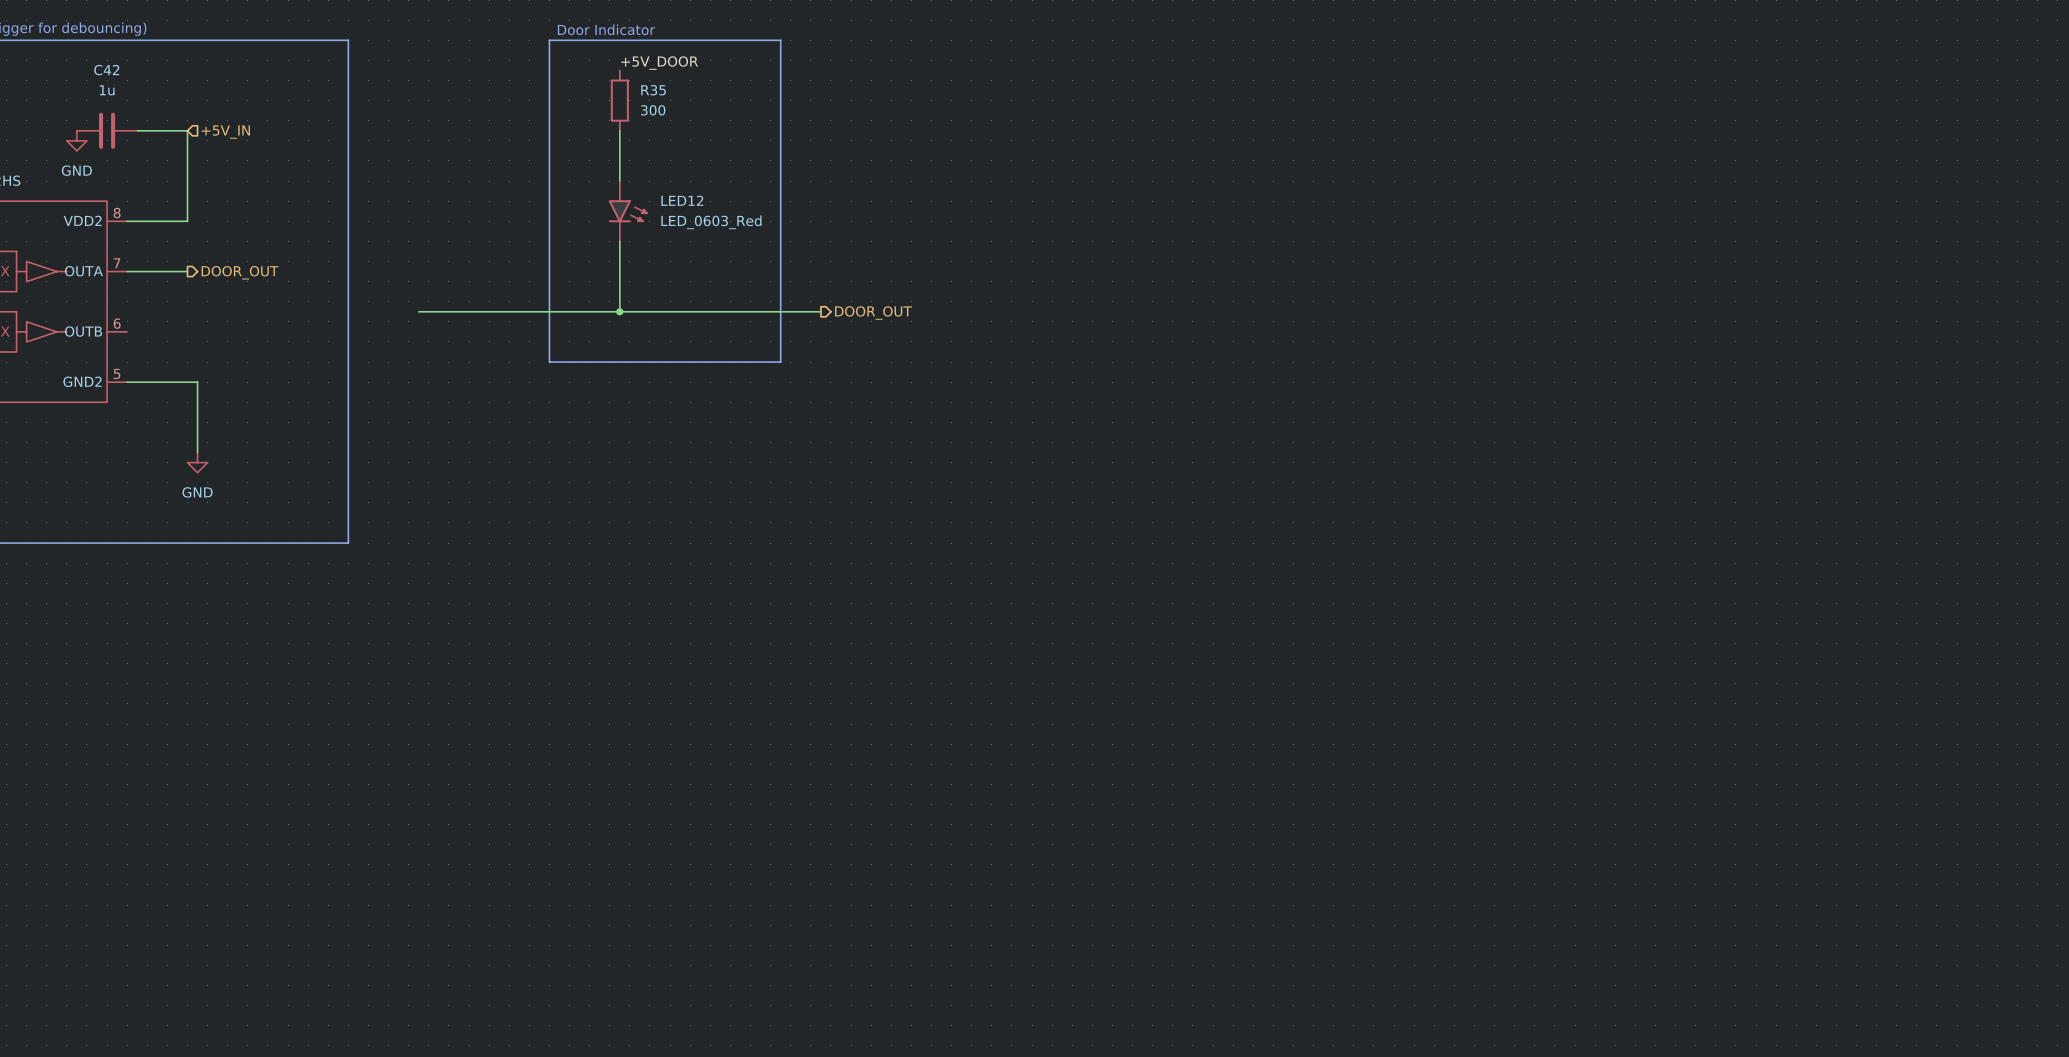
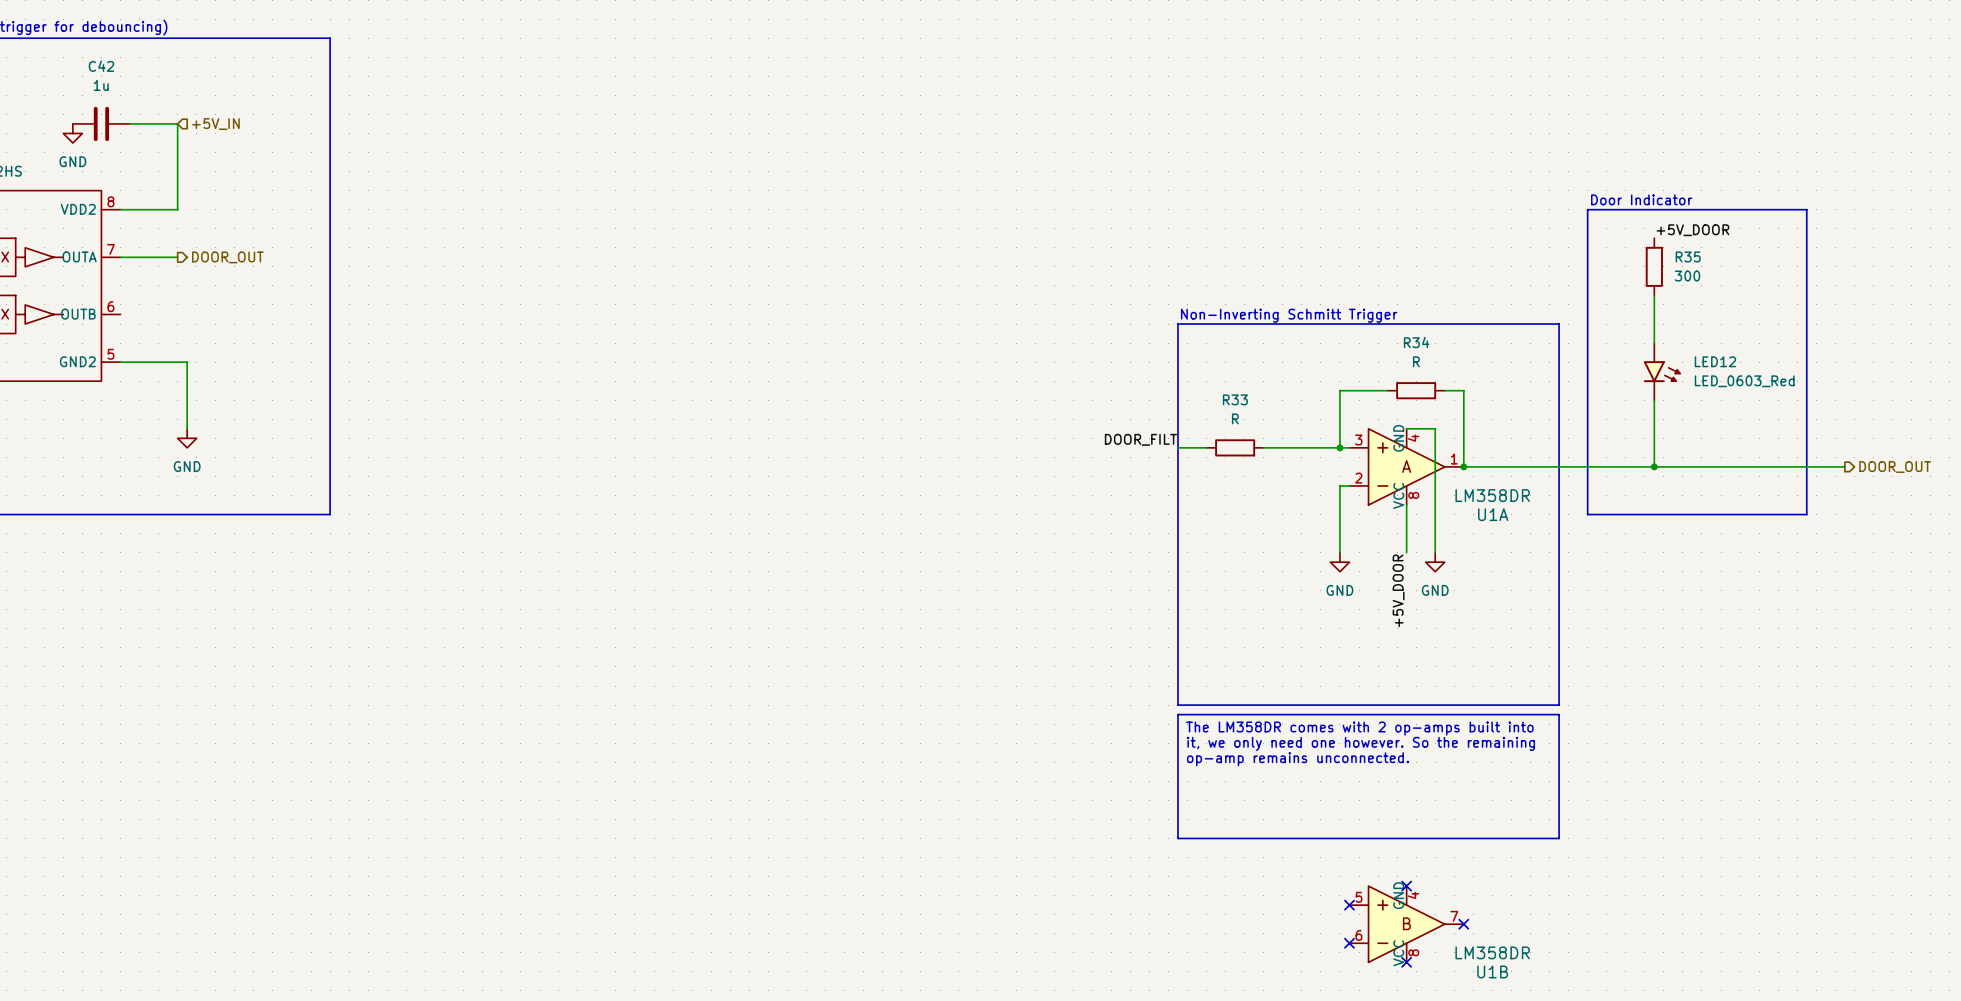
text: Door Indicator (606, 29) -> none
line: (549, 40) (780, 40) (780, 362) (549, 362) (549, 40) -> none
label: +5V_DOOR (659, 63) -> none
R35 position: (619, 100) -> (1654, 266)
wire: (619, 130) (619, 181) -> none
text: none -> Door Indicator (1641, 199)
LED12 position: (628, 211) -> (1662, 371)
line: none -> (1587, 209) (1806, 209) (1806, 514) (1587, 514) (1587, 209)
wire: (619, 241) (619, 311) -> none
label: none -> +5V_DOOR (1692, 230)
wire: (418, 311) (820, 311) -> none
junction: (619, 311) -> none
wire: none -> (1654, 295) (1654, 343)
hierarchical label: DOOR_OUT (873, 312) -> none
text: none -> Non-Inverting Schmitt Trigger (1289, 315)
line: none -> (1177, 324) (1559, 324) (1559, 705) (1177, 705) (1177, 324)
wire: none -> (1387, 390) (1339, 390) (1339, 447)
R34: none -> R (1416, 390)
wire: none -> (1444, 390) (1463, 390) (1463, 466) (1844, 466)
wire: none -> (1654, 400) (1654, 466)
wire: none -> (1406, 428) (1435, 428) (1435, 552)
label: none -> DOOR_FILT (1140, 439)
wire: none -> (1177, 447) (1206, 447)
R33: none -> R (1235, 447)
wire: none -> (1263, 447) (1349, 447)
junction: none -> (1339, 447)
U1A: none -> LM358DR (1406, 466)
junction: none -> (1463, 466)
junction: none -> (1654, 466)
hierarchical label: none -> DOOR_OUT (1895, 467)
wire: none -> (1349, 485) (1339, 485) (1339, 552)
wire: none -> (1406, 505) (1406, 552)
power symbol: none -> GND (1339, 562)
power symbol: none -> GND (1435, 562)
label: none -> +5V_DOOR (1398, 590)
line: none -> (1177, 714) (1177, 838) (1559, 838) (1559, 714) (1177, 714)
text: none -> The LM358DR comes with 2 op-amps built into (1359, 728)
text: none -> it, we only need one however. So the remaining (1361, 743)
text: none -> op-amp remains unconnected. (1297, 759)
no-connect mark: none -> (1406, 886)
no-connect mark: none -> (1349, 905)
U1B: none -> LM358DR (1406, 924)
no-connect mark: none -> (1463, 924)
no-connect mark: none -> (1349, 943)
no-connect mark: none -> (1406, 962)

